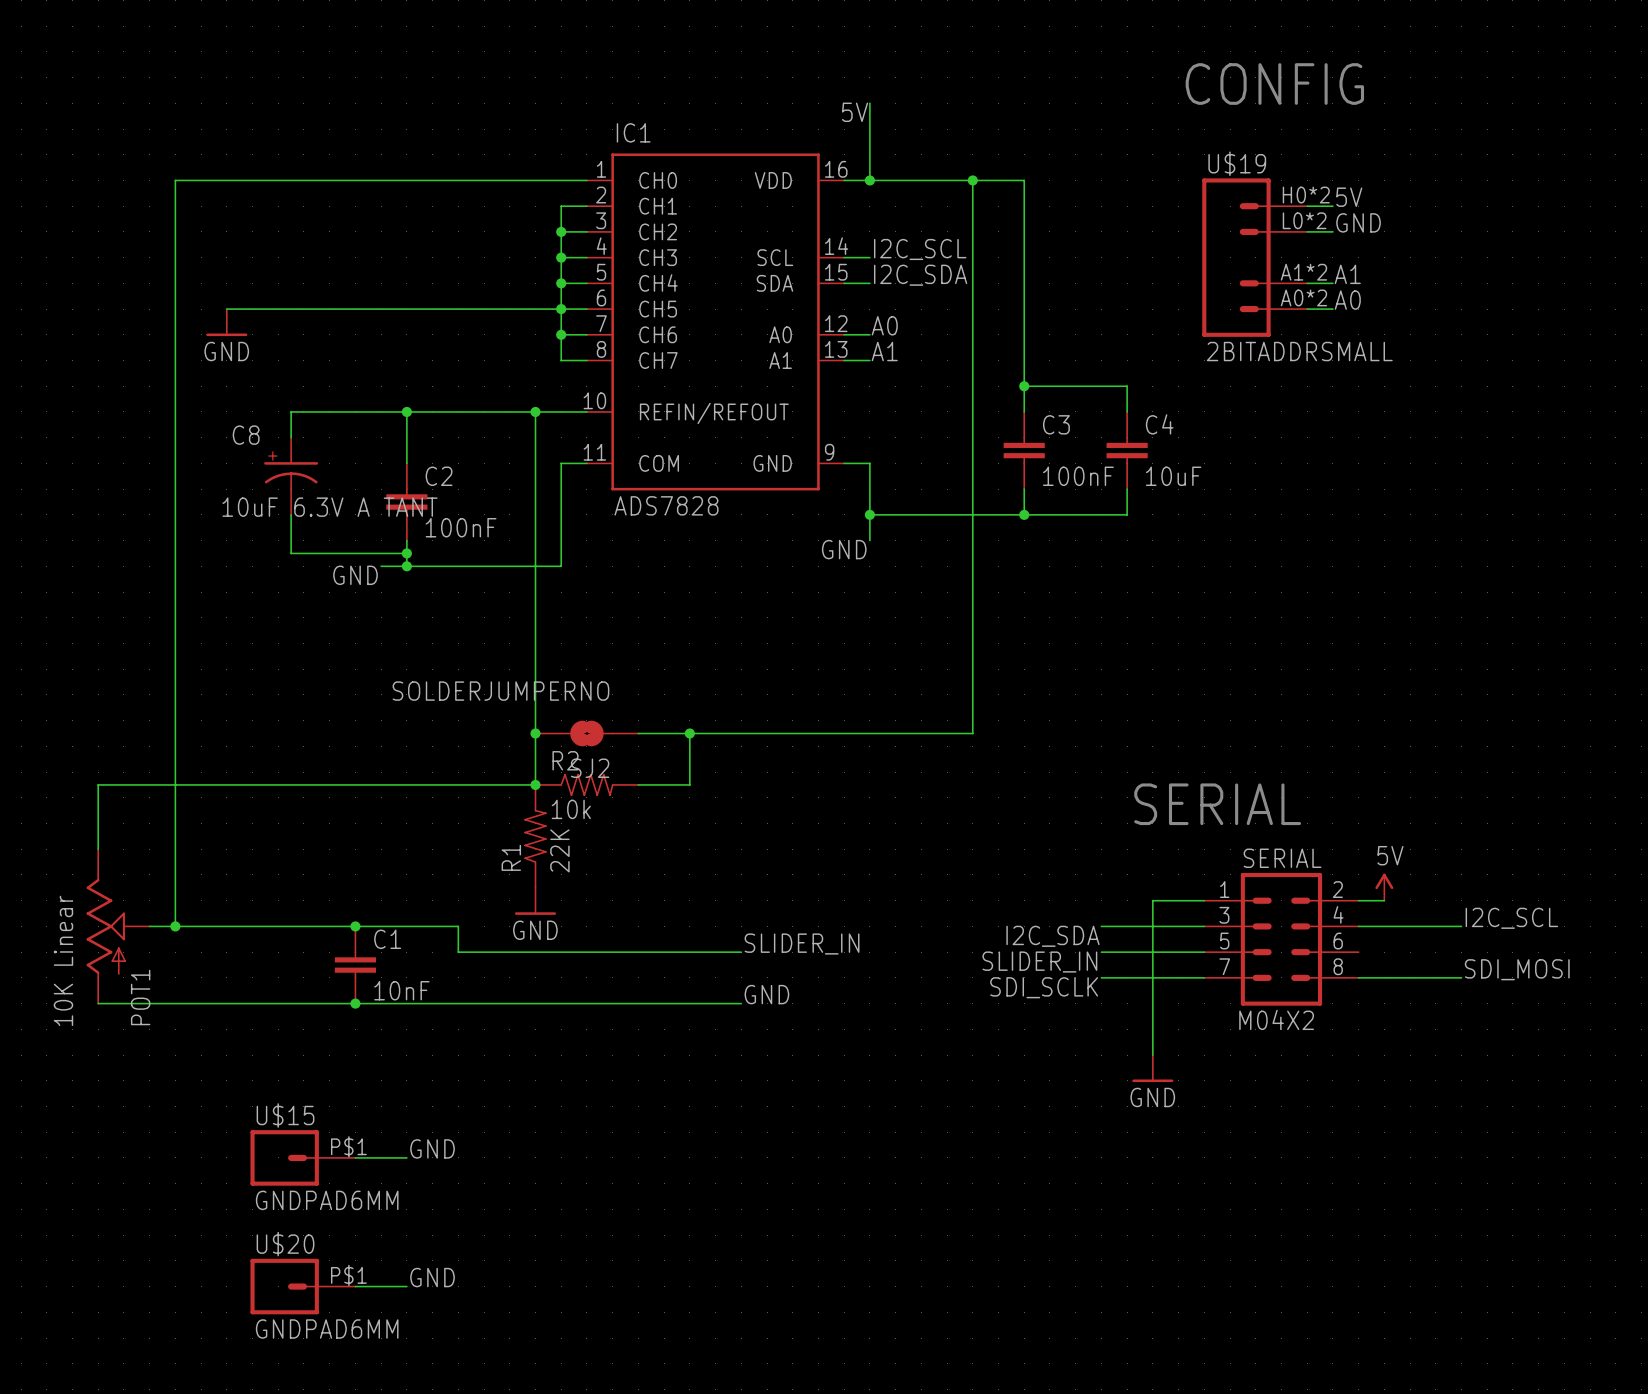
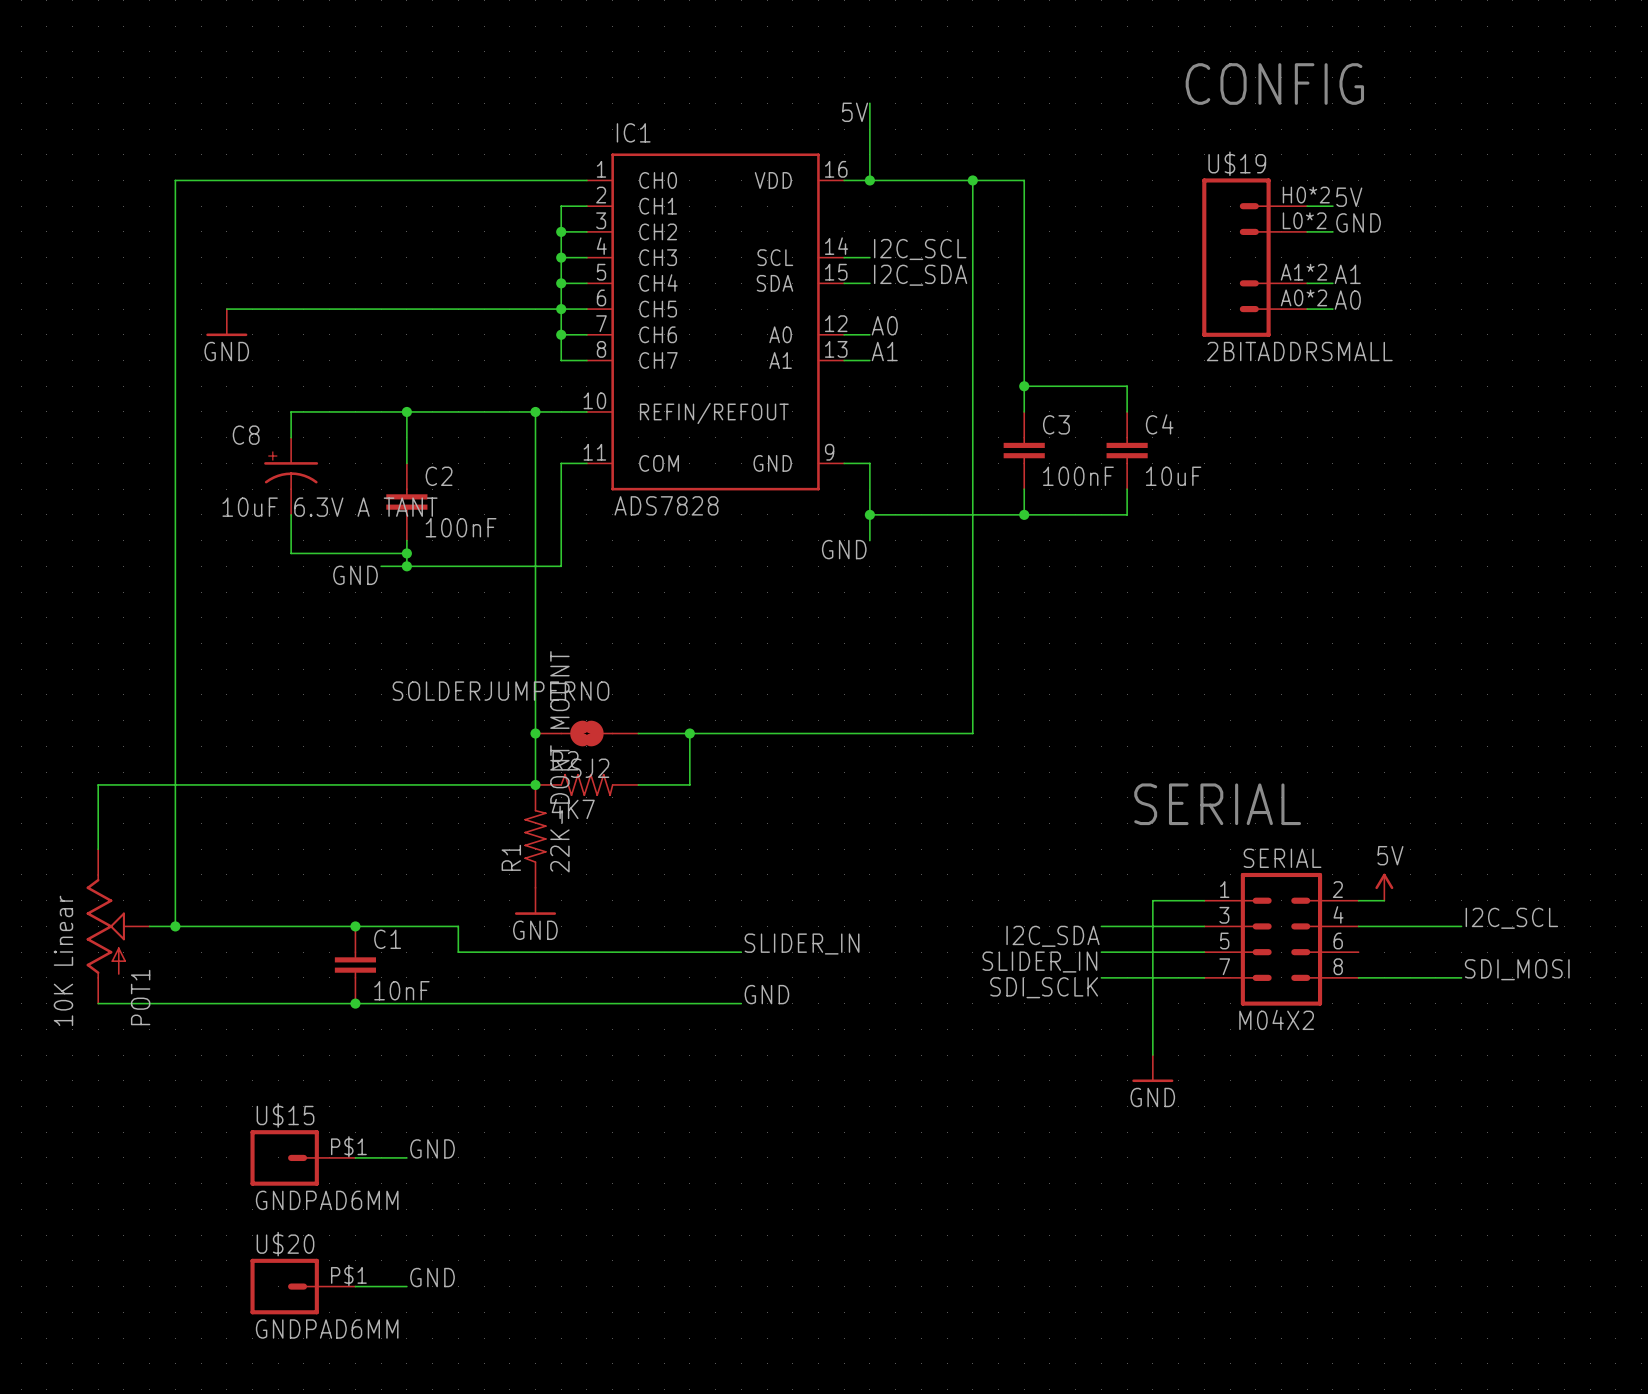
R2 value: 10k (571, 809) -> 4K7 (573, 808)
R1 value: 22K (559, 850) -> 22K-DONT MOUNT (559, 761)

